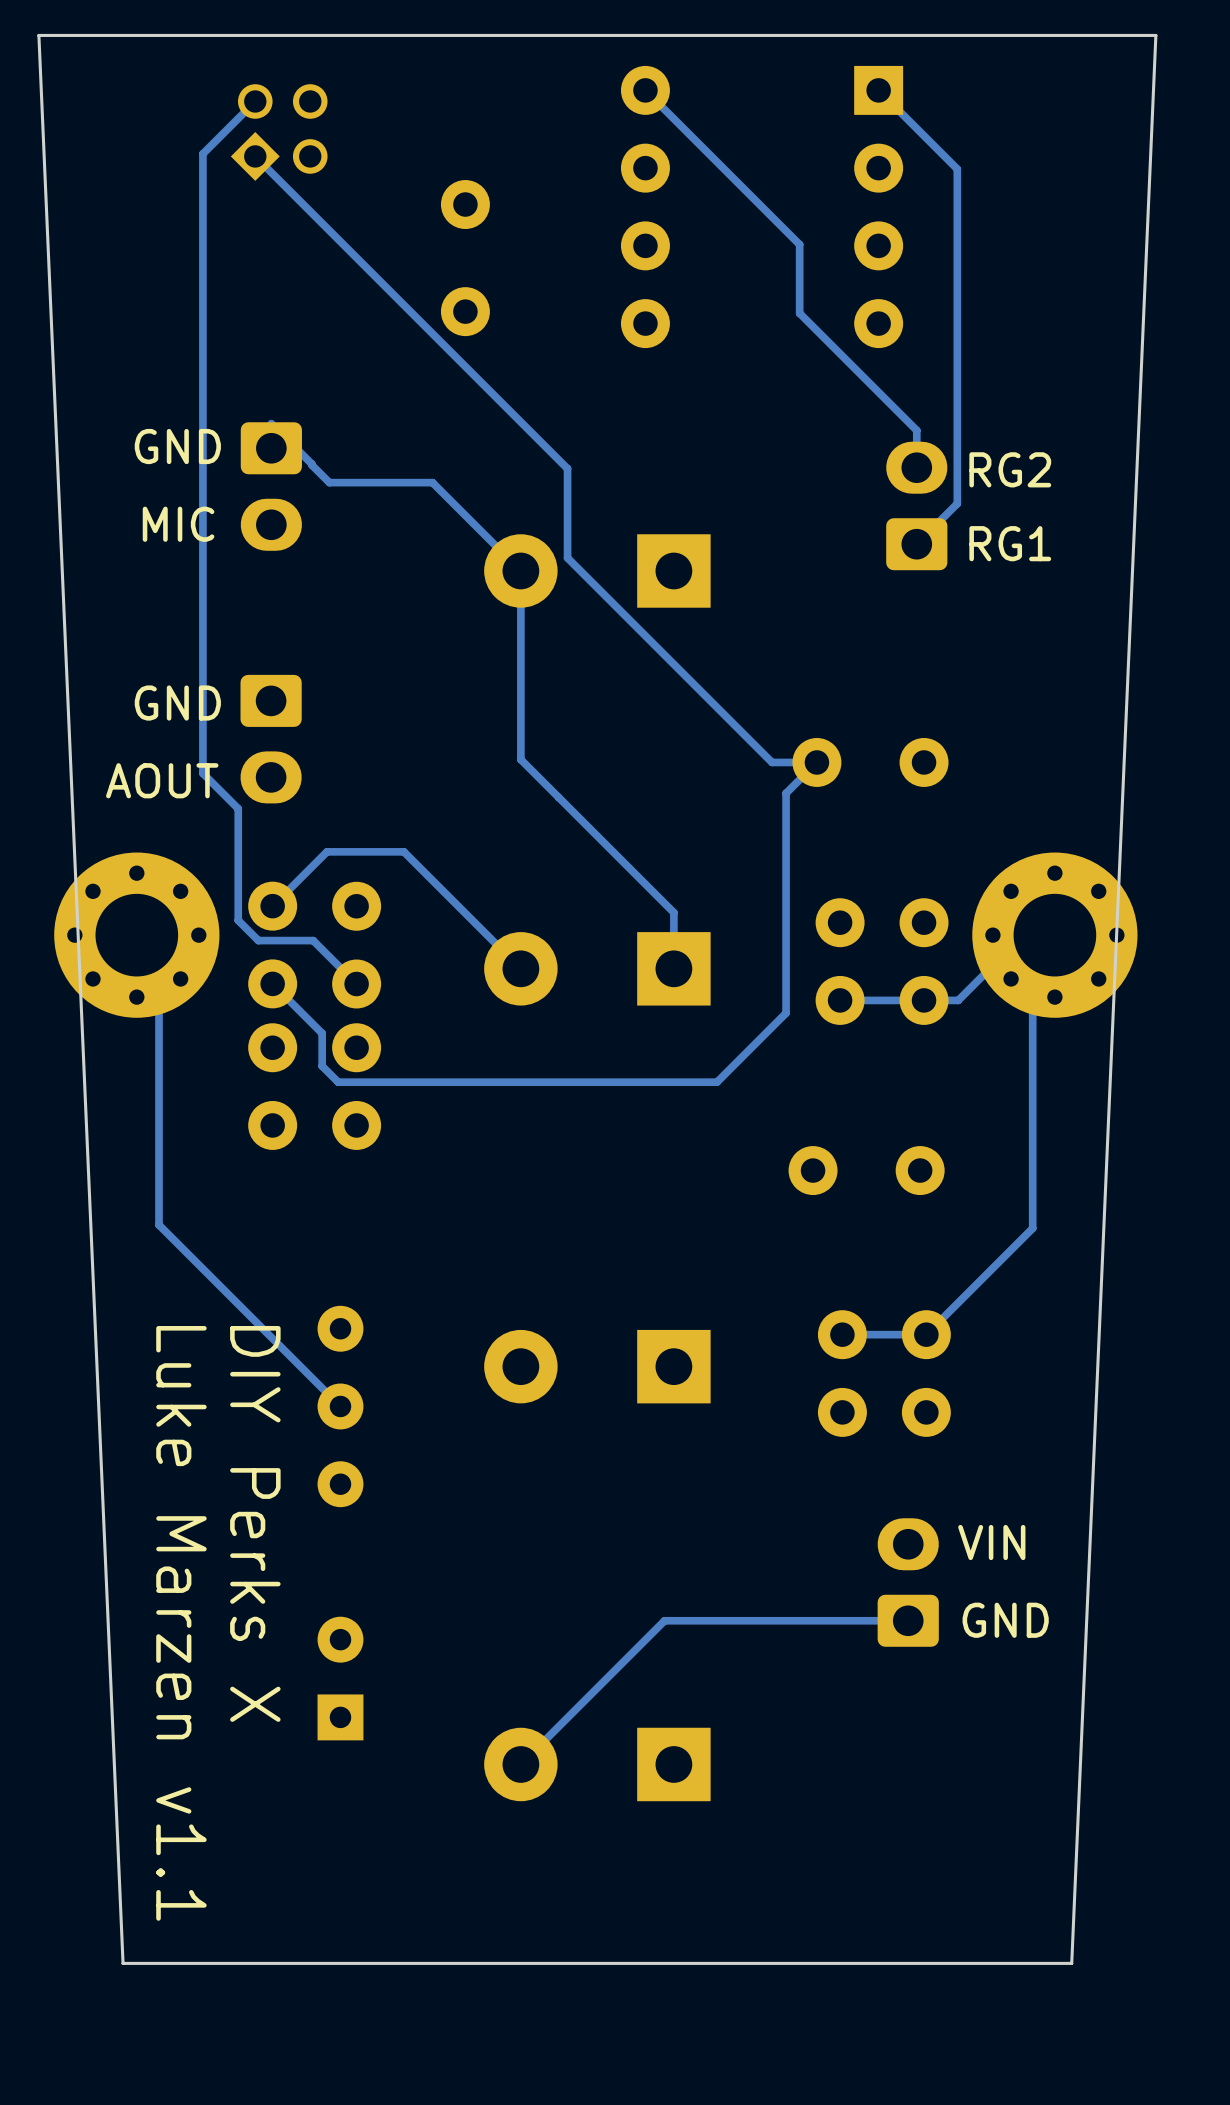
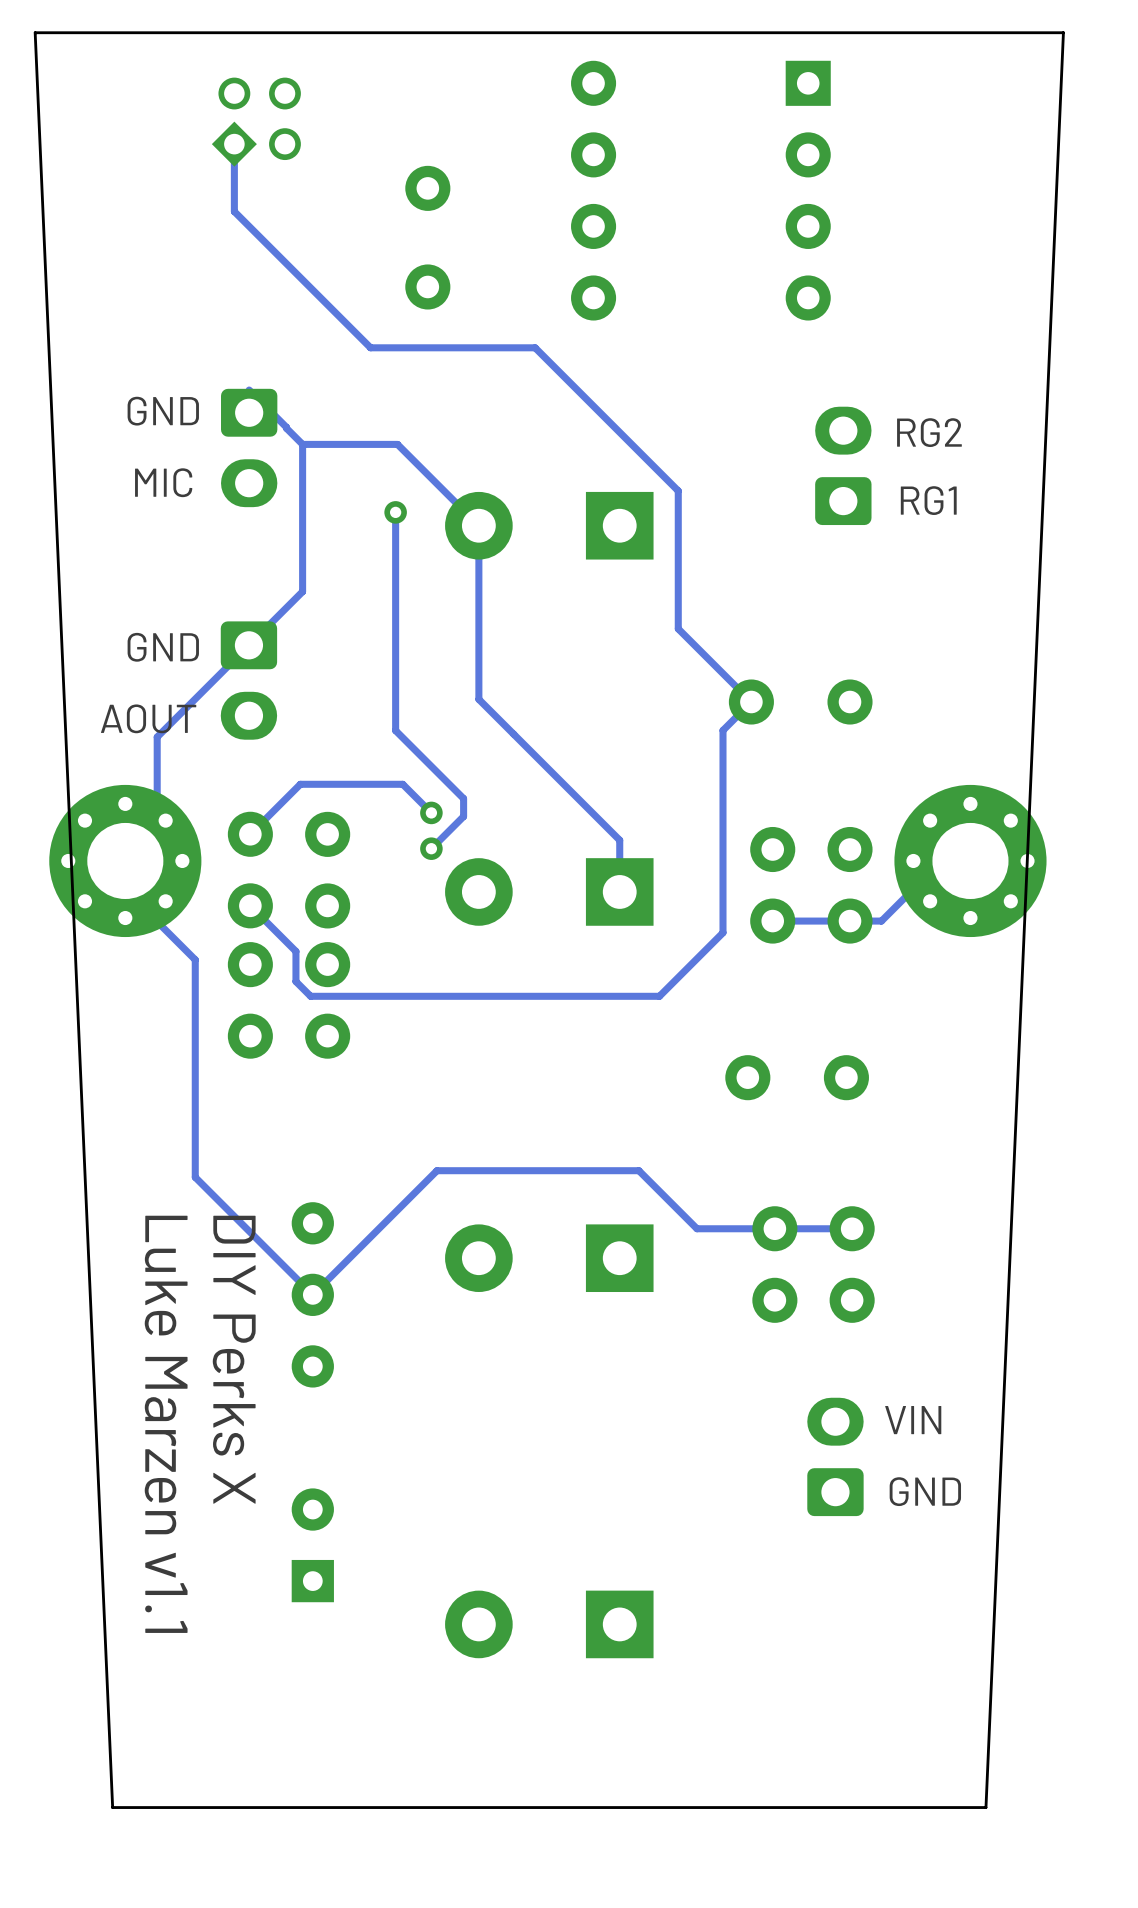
track: (645, 90) (799, 244) (799, 313) (916, 430) (916, 467) -> none
track: (878, 90) (957, 169) (957, 503) (916, 544) -> none
track: (255, 101) (202, 153) (202, 773) (238, 808) (238, 920) (258, 940) (313, 940) (356, 984) -> none
track: (255, 156) (567, 468) (567, 557) (772, 762) (816, 762) -> (234, 144) (234, 211) (370, 347) (535, 347) (678, 490) (678, 628) (751, 702)
track: none -> (302, 444) (302, 591) (157, 737) (157, 800)
track: none -> (395, 512) (395, 730) (463, 798) (463, 816) (431, 848)
via: none -> (395, 512)
track: (403, 851) (520, 968) -> (371, 784) (402, 784) (431, 812)
via: none -> (431, 812)
via: none -> (431, 848)
track: (1054, 935) (1054, 965) (1032, 987) (1032, 1228) (926, 1334) -> none
track: (158, 987) (159, 1224) (212, 1278) -> (145, 909) (195, 959) (195, 1177)
track: none -> (774, 1228) (696, 1228) (638, 1170) (436, 1170) (312, 1294)
track: (908, 1620) (664, 1620) (520, 1764) -> none

